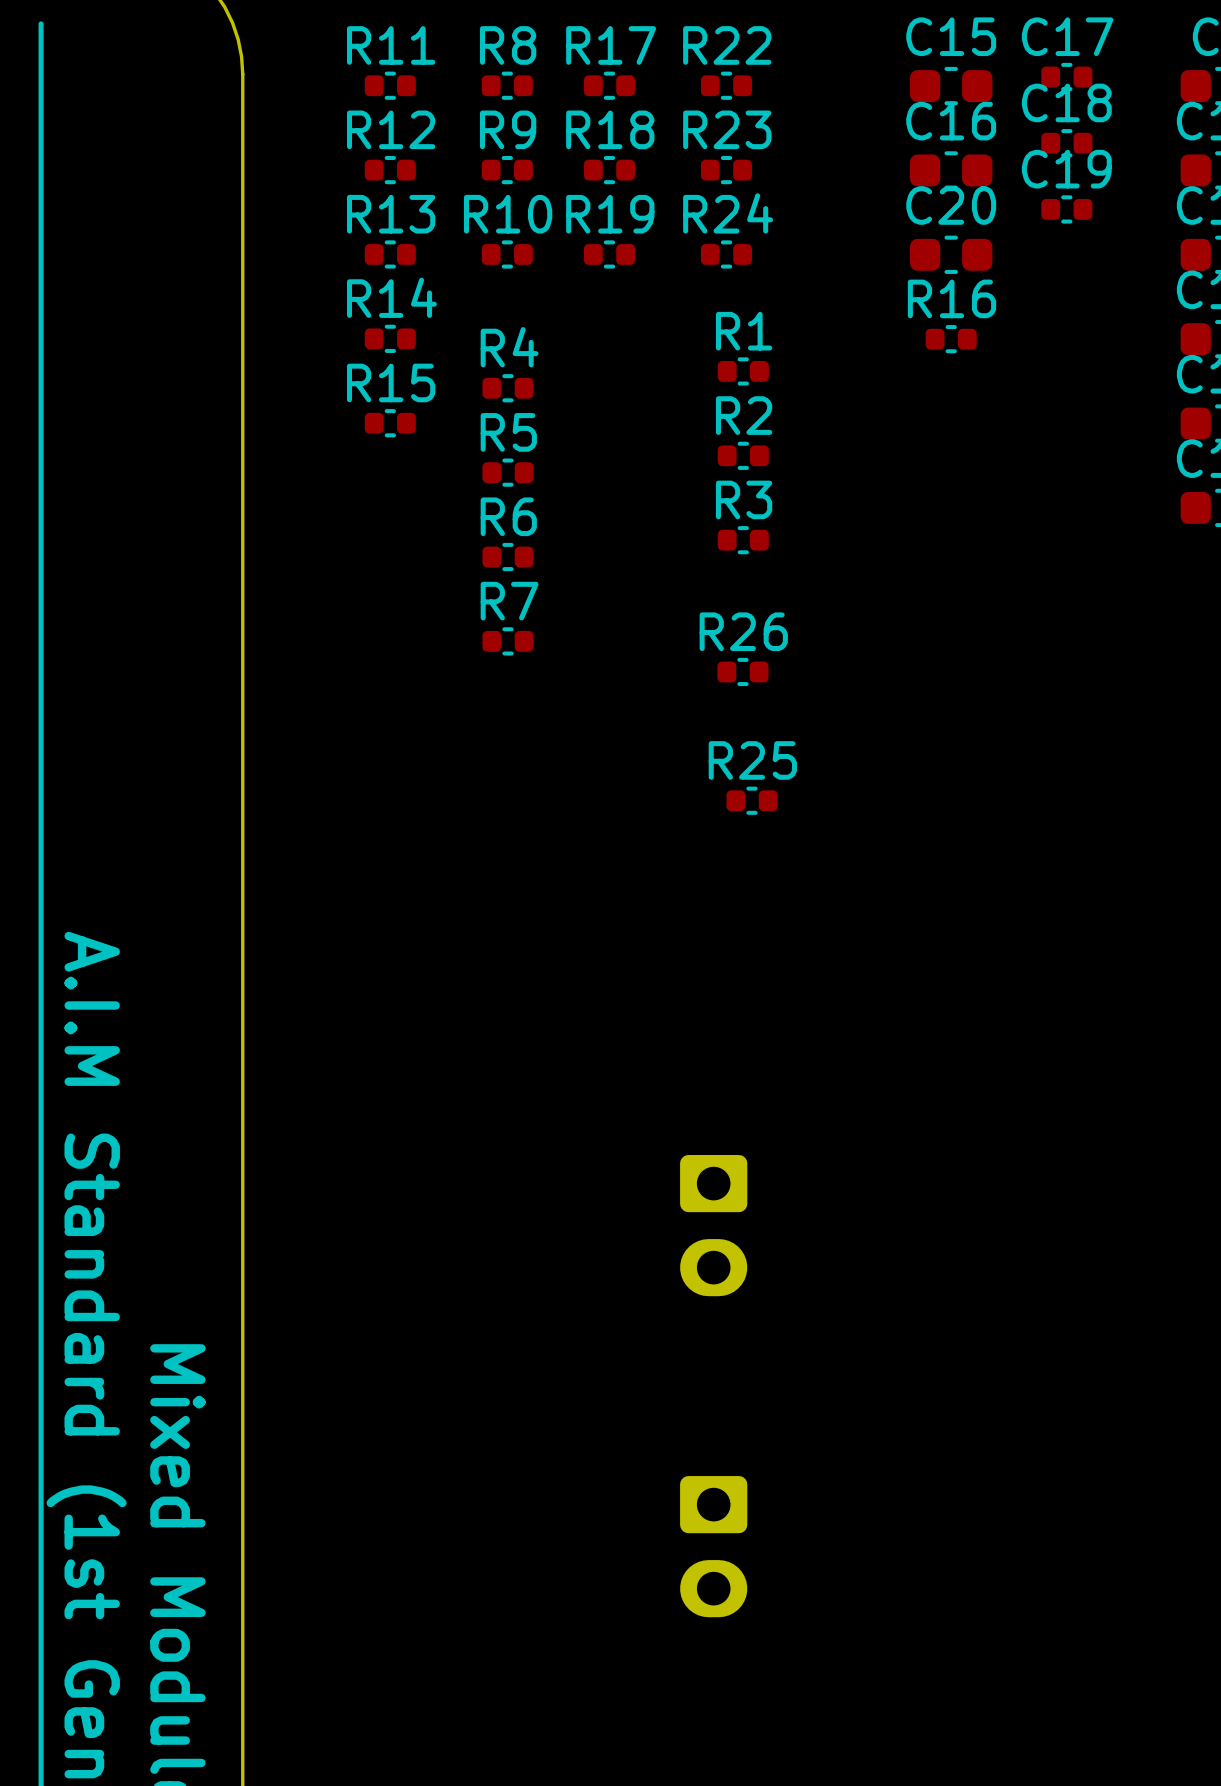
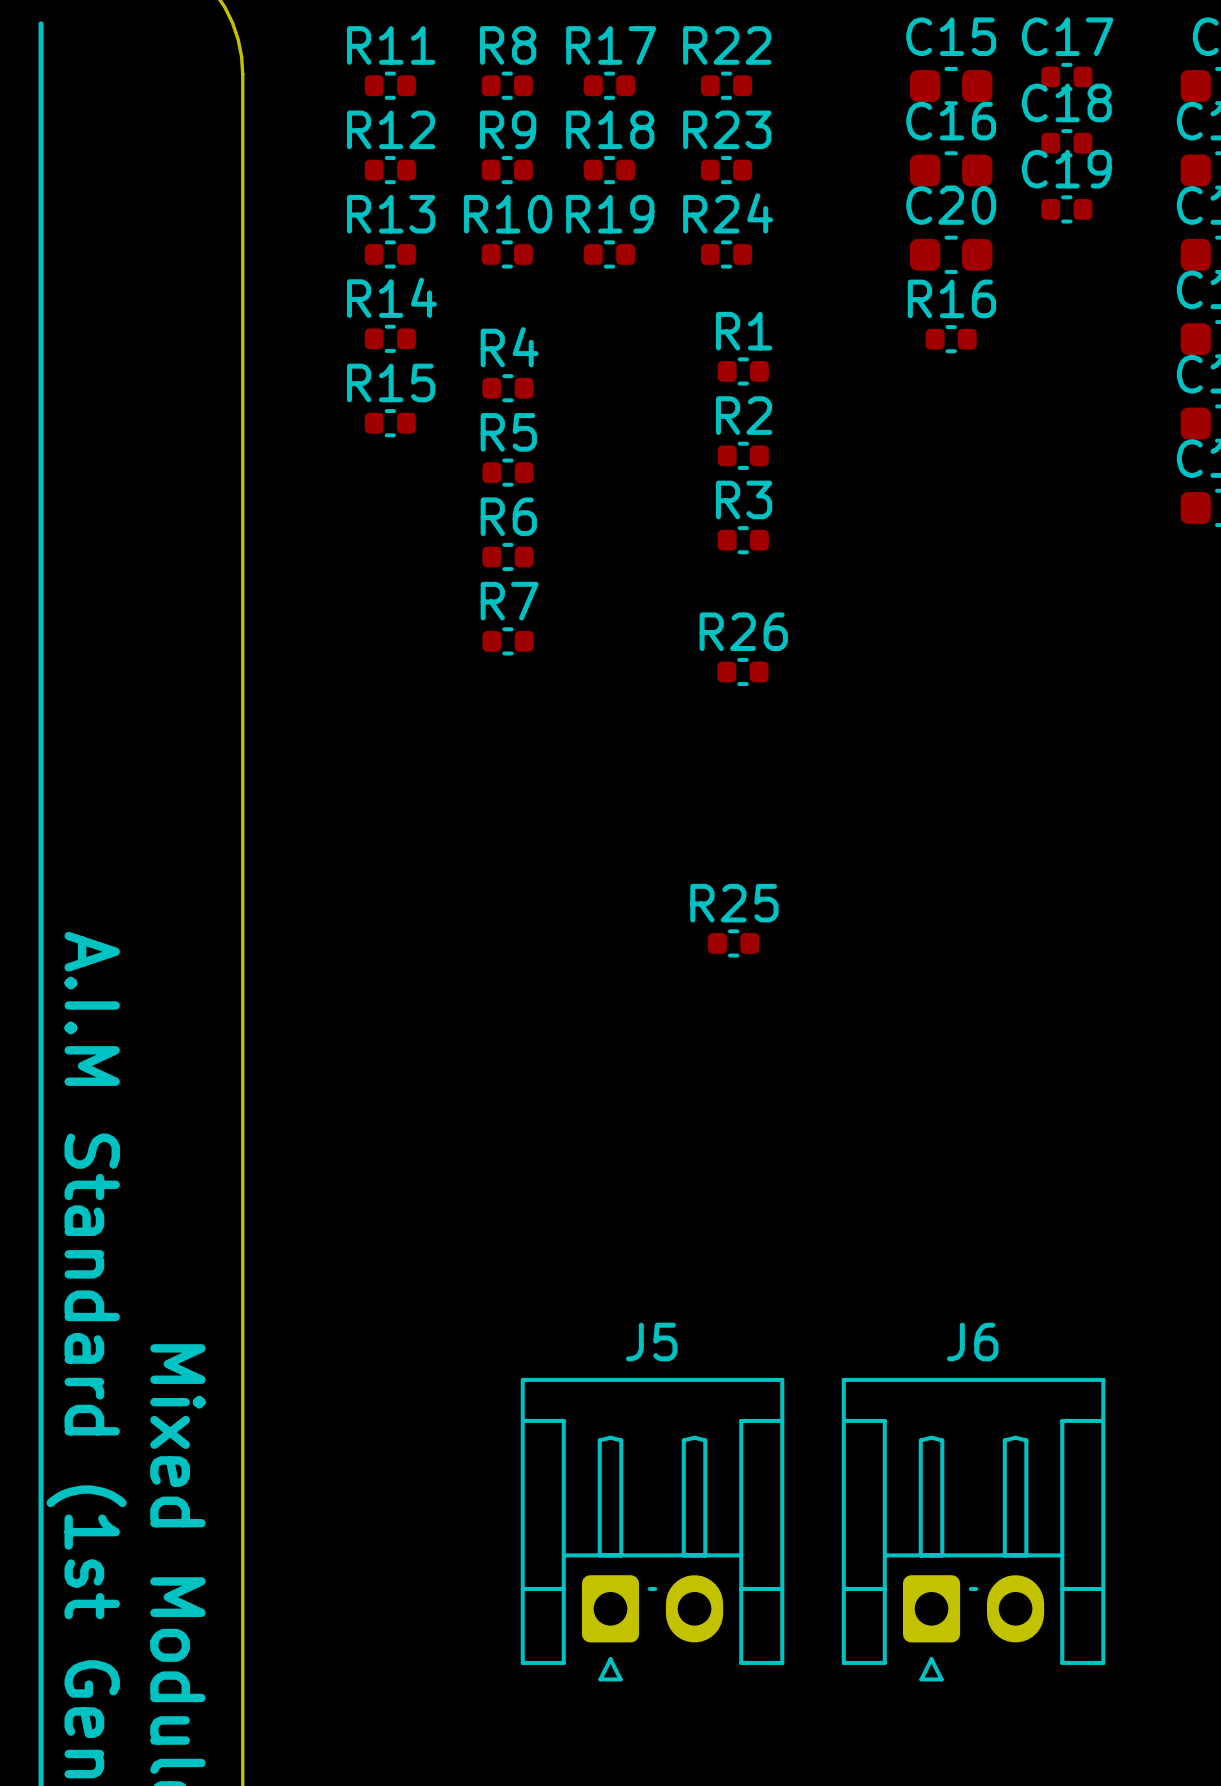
R25 position: (752, 800) -> (733, 943)
J5 side: bottom (713, 1225) -> top (652, 1529)
J6 side: bottom (713, 1546) -> top (973, 1529)

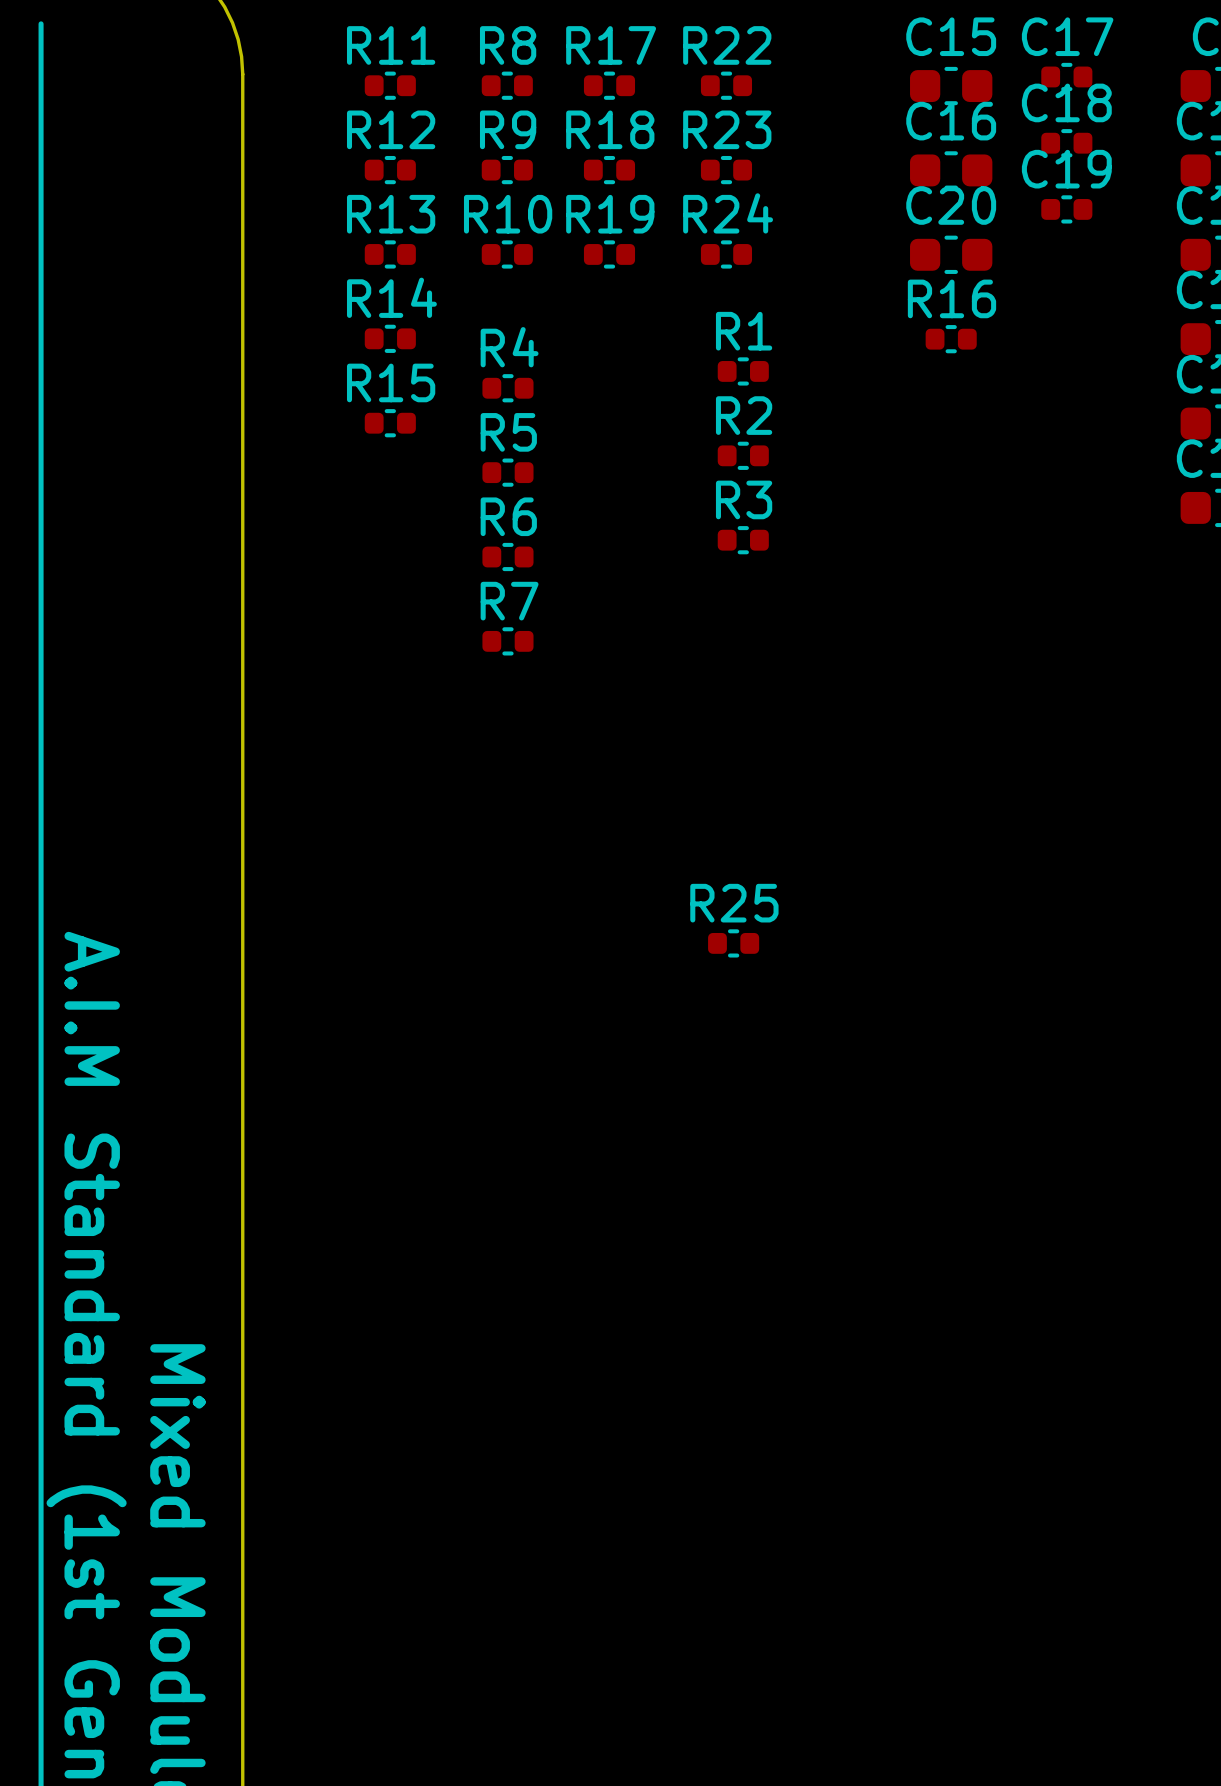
R26: (742, 671) -> none
J5: (652, 1529) -> none
J6: (973, 1529) -> none

